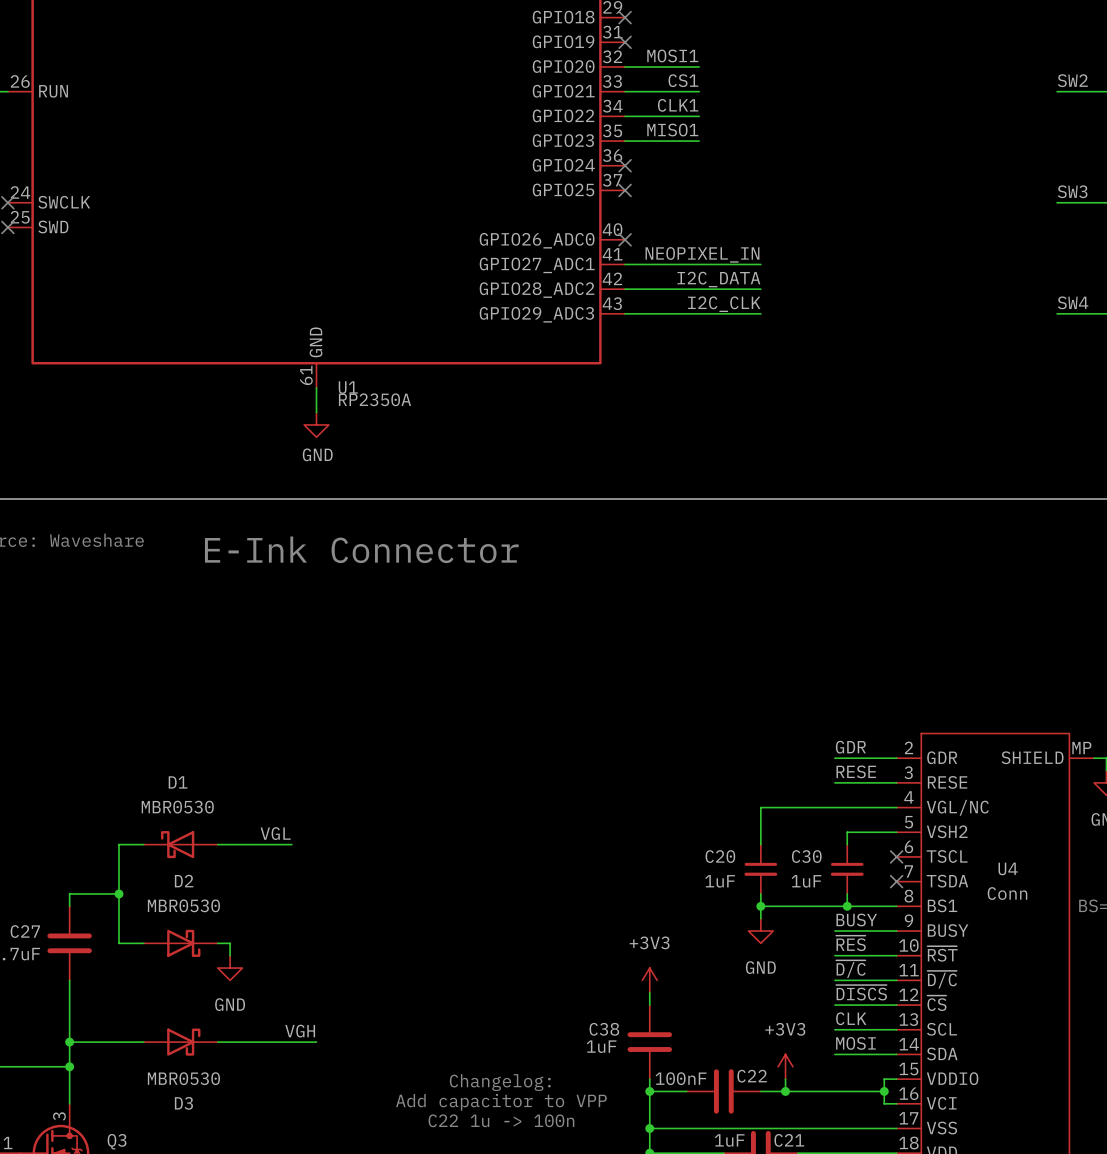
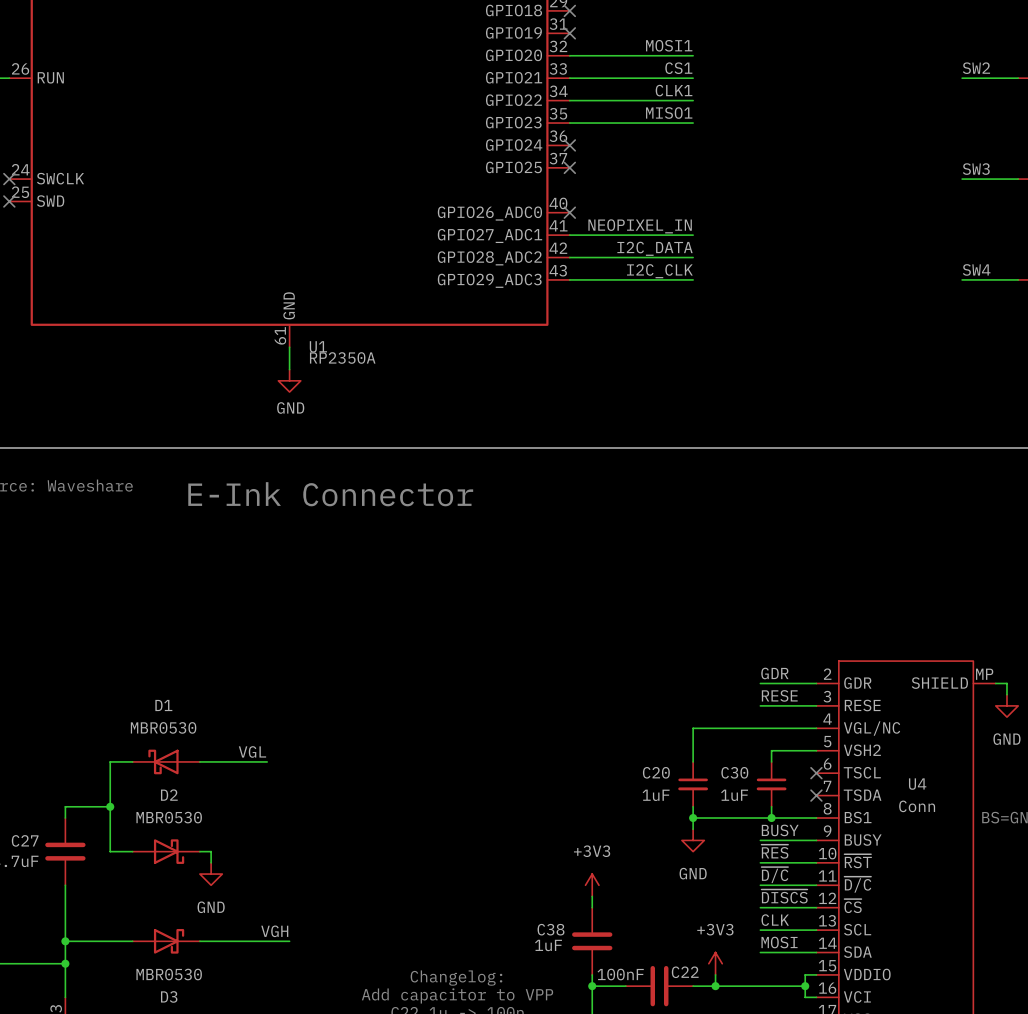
label position: MOSI1 (672, 55) -> MOSI1 (669, 45)
wire: none -> (637, 55) (693, 55)
label position: CS1 (683, 80) -> CS1 (678, 68)
wire: none -> (637, 78) (693, 78)
label position: CLK1 (678, 105) -> CLK1 (674, 90)
wire: none -> (637, 100) (693, 100)
label position: MISO1 (672, 130) -> MISO1 (669, 113)
wire: none -> (637, 123) (693, 123)

